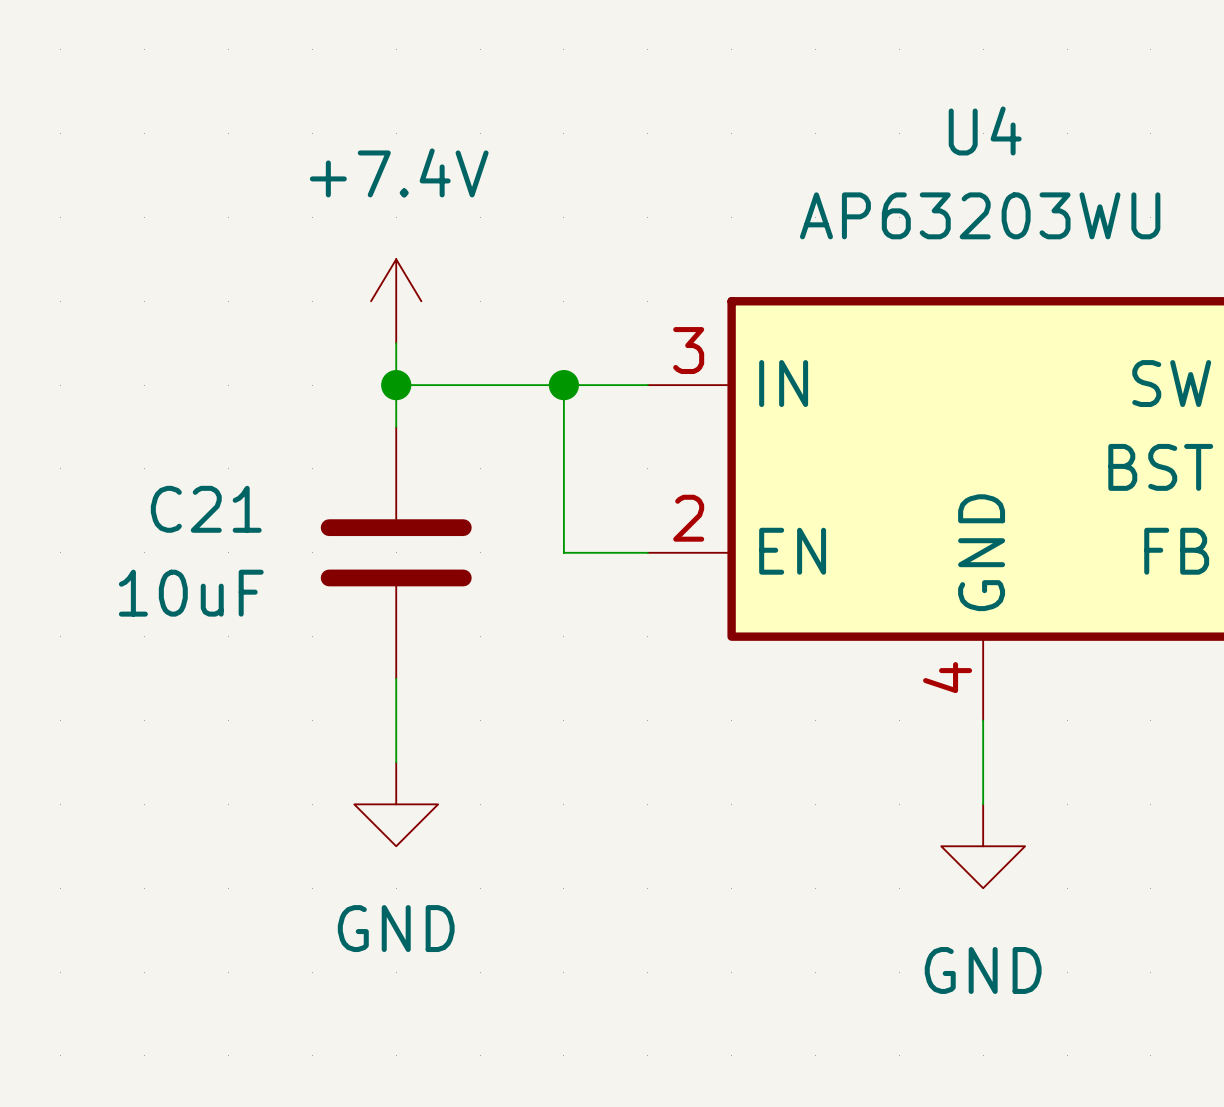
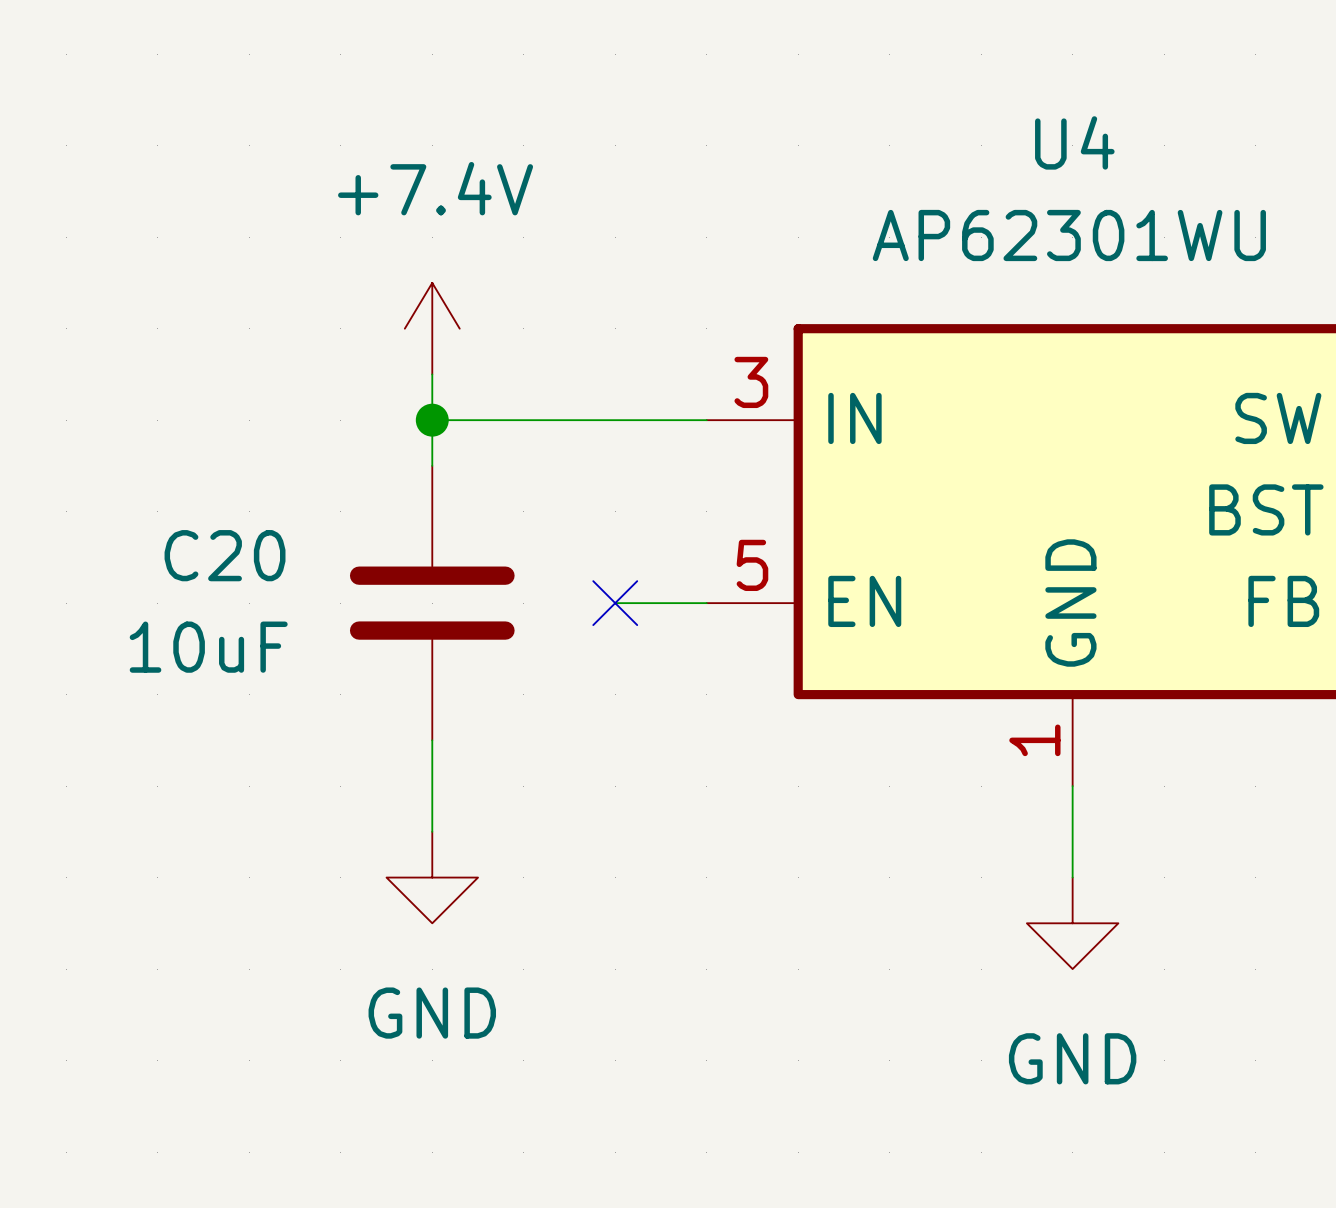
U4 value: AP63203WU (980, 215) -> AP62301WU (1069, 235)
wire: (563, 385) (563, 552) -> none
junction: (563, 385) -> none
C21 name: C21 (206, 509) -> C20 (225, 555)
U4 pin number: 2 (688, 518) -> 5 (752, 565)
no-connect mark: none -> (615, 603)
U4 pin number: 4 (947, 677) -> 1 (1034, 740)

